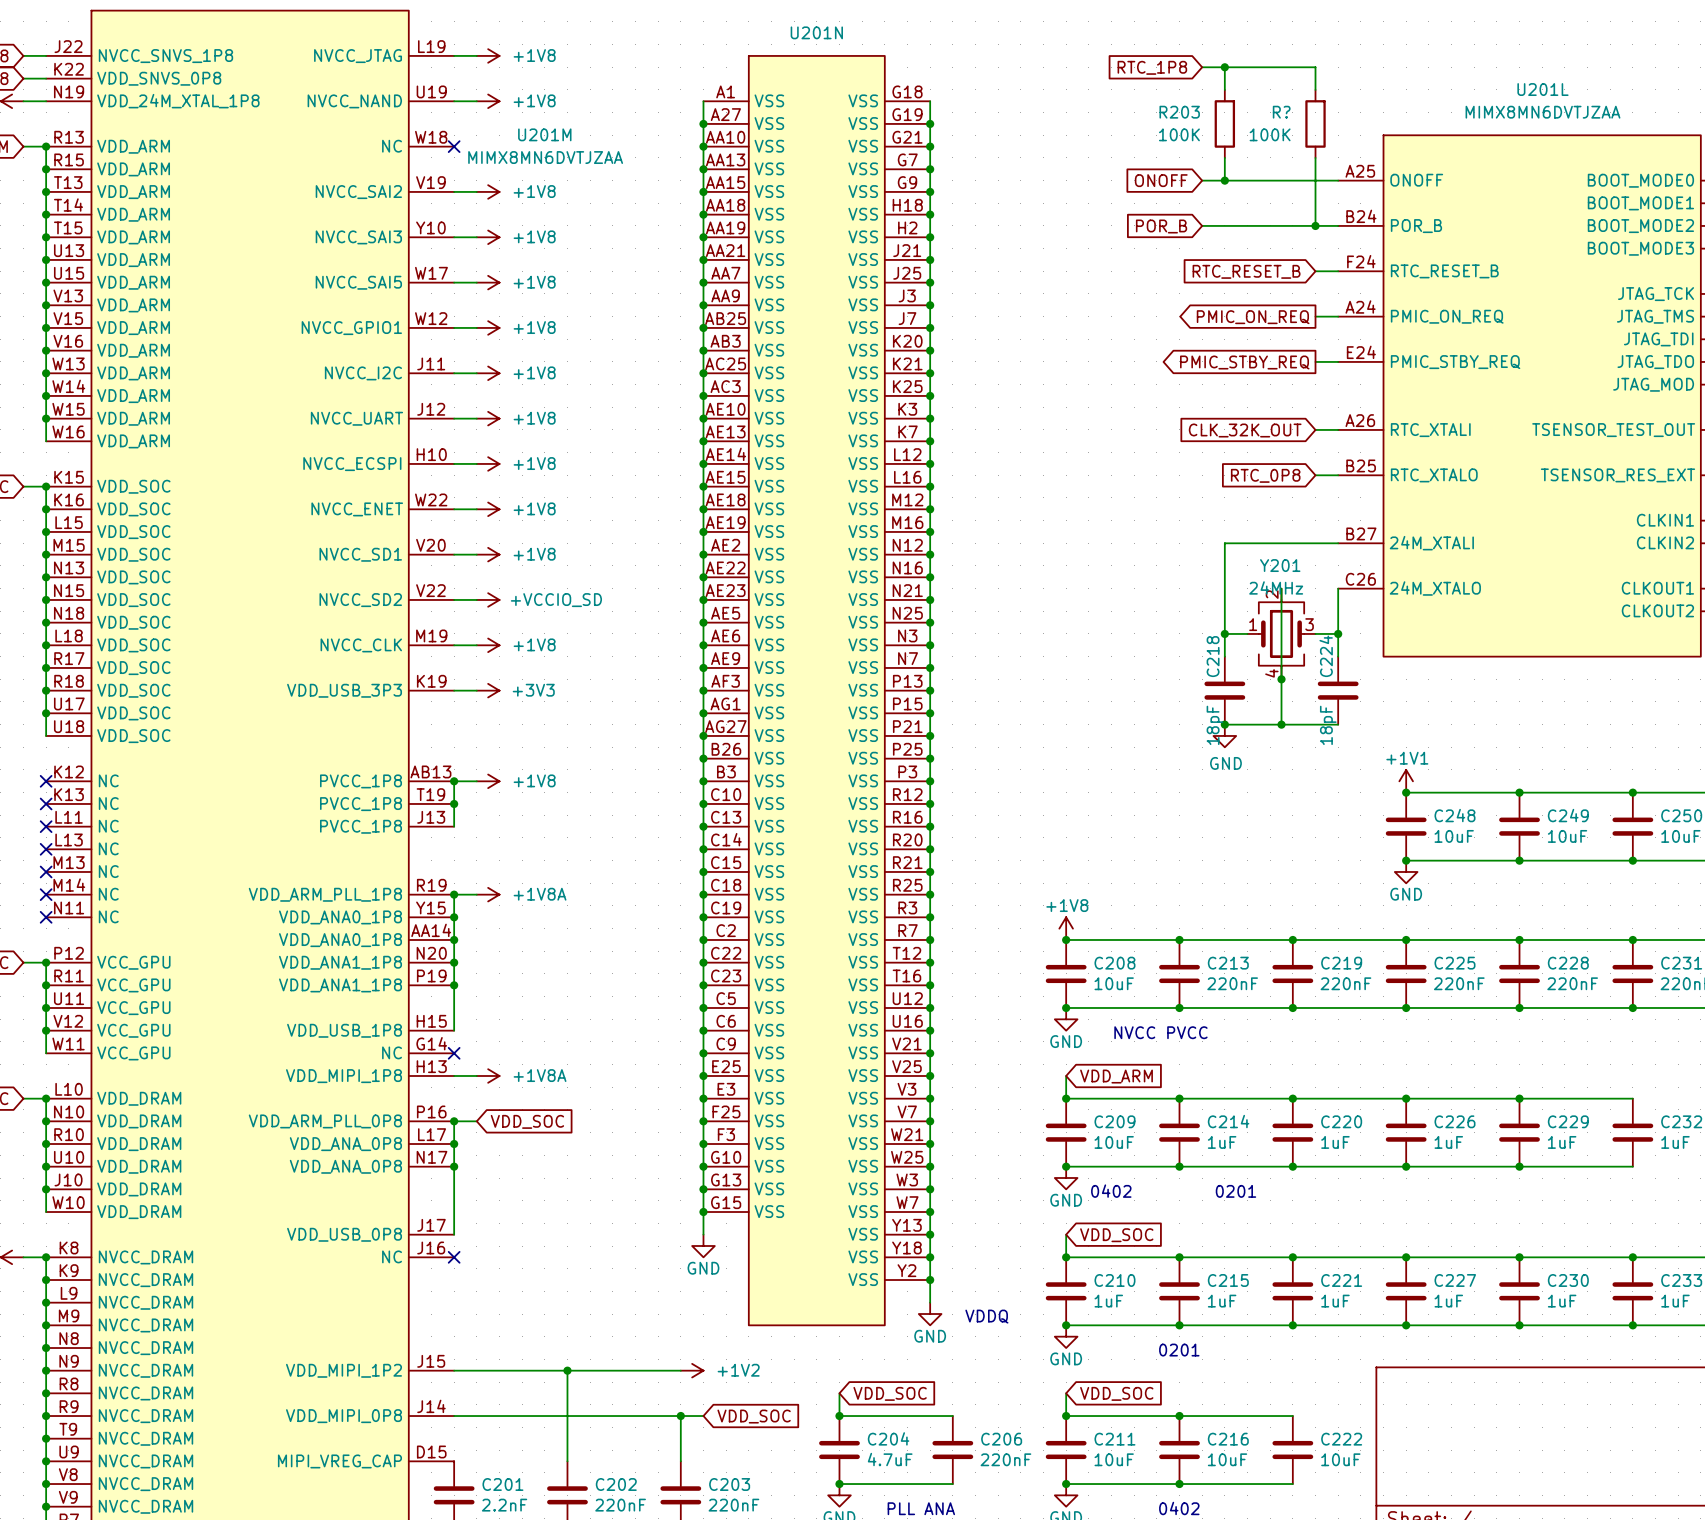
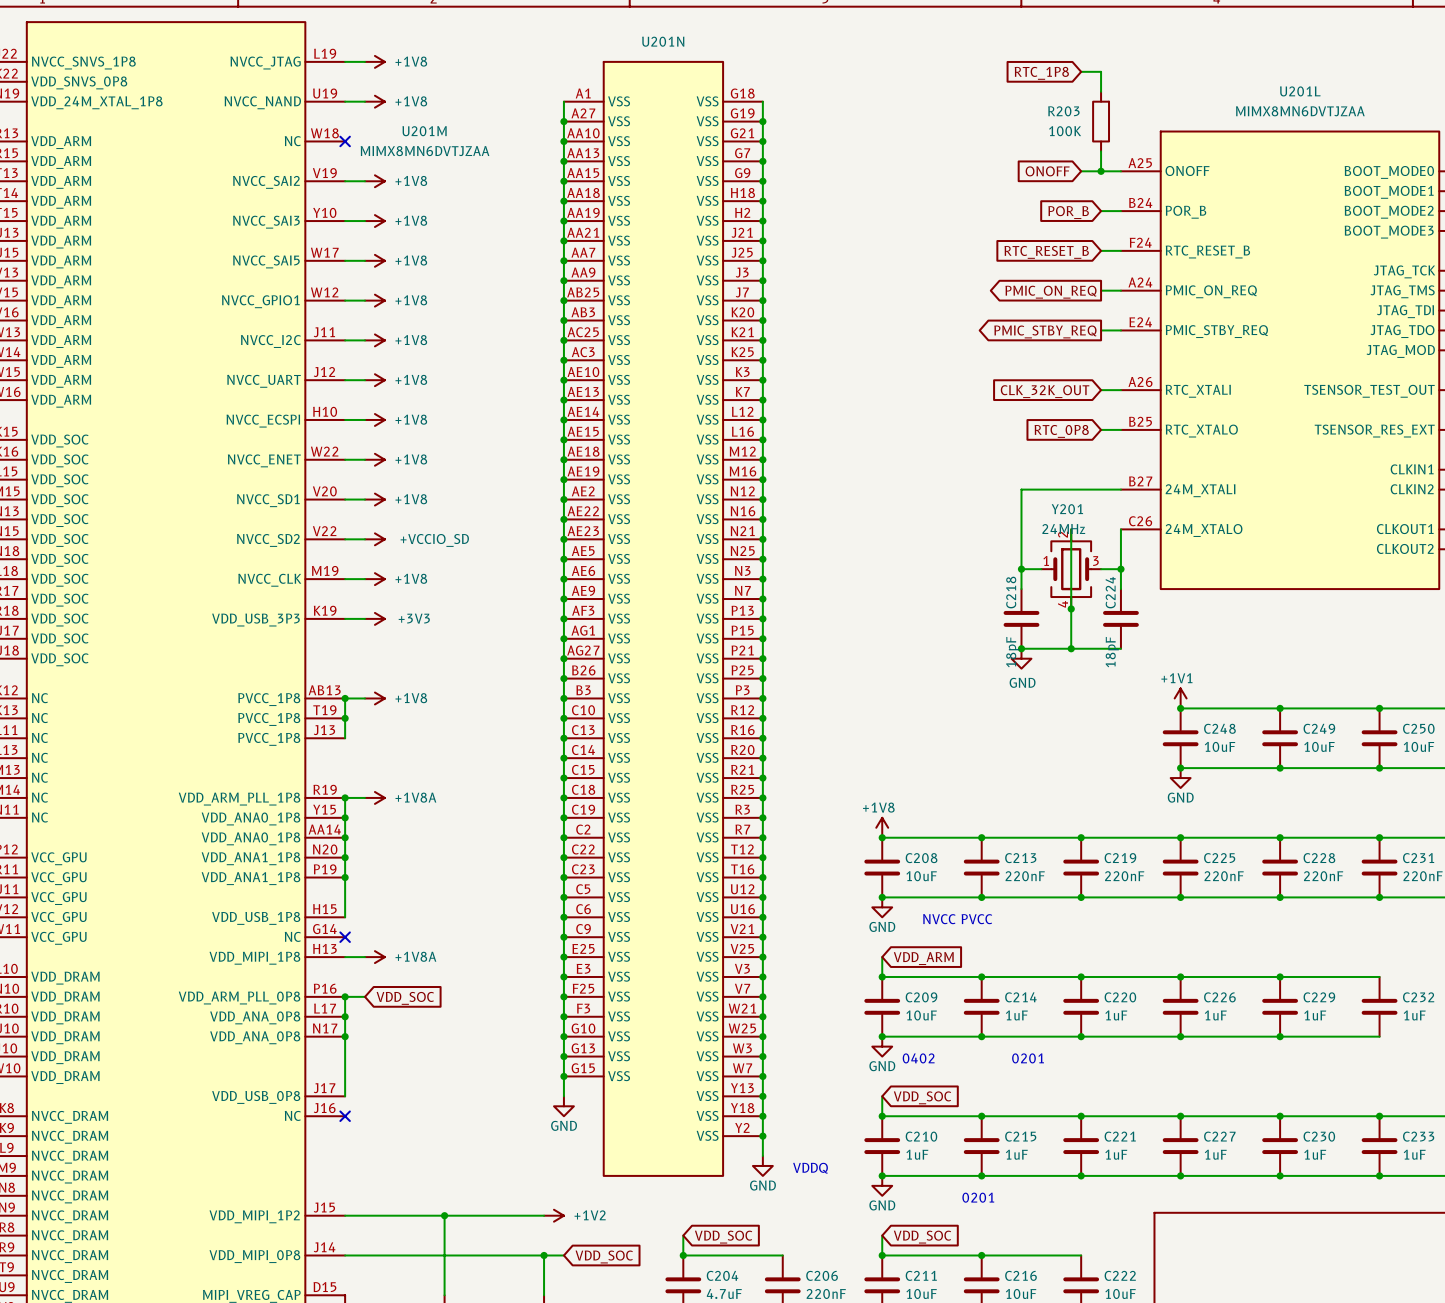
global label position: RTC_1P8 (1152, 67) -> RTC_1P8 (1041, 73)
wire: (1202, 67) (1292, 67) -> none
wire: (1224, 67) (1224, 89) -> none
junction: (1224, 67) -> none
R? name: R? (1281, 112) -> R203 (1063, 111)
R203: 100K (1224, 123) -> none
wire: (1224, 157) (1224, 180) -> none
global label position: ONOFF (1161, 180) -> ONOFF (1047, 171)
wire: (1202, 180) (1292, 180) -> none
junction: (1224, 180) -> none
wire: (1315, 180) (1315, 225) (1202, 225) -> none
junction: none -> (1101, 171)
junction: (1315, 225) -> none
global label position: POR_B (1161, 226) -> POR_B (1068, 212)

